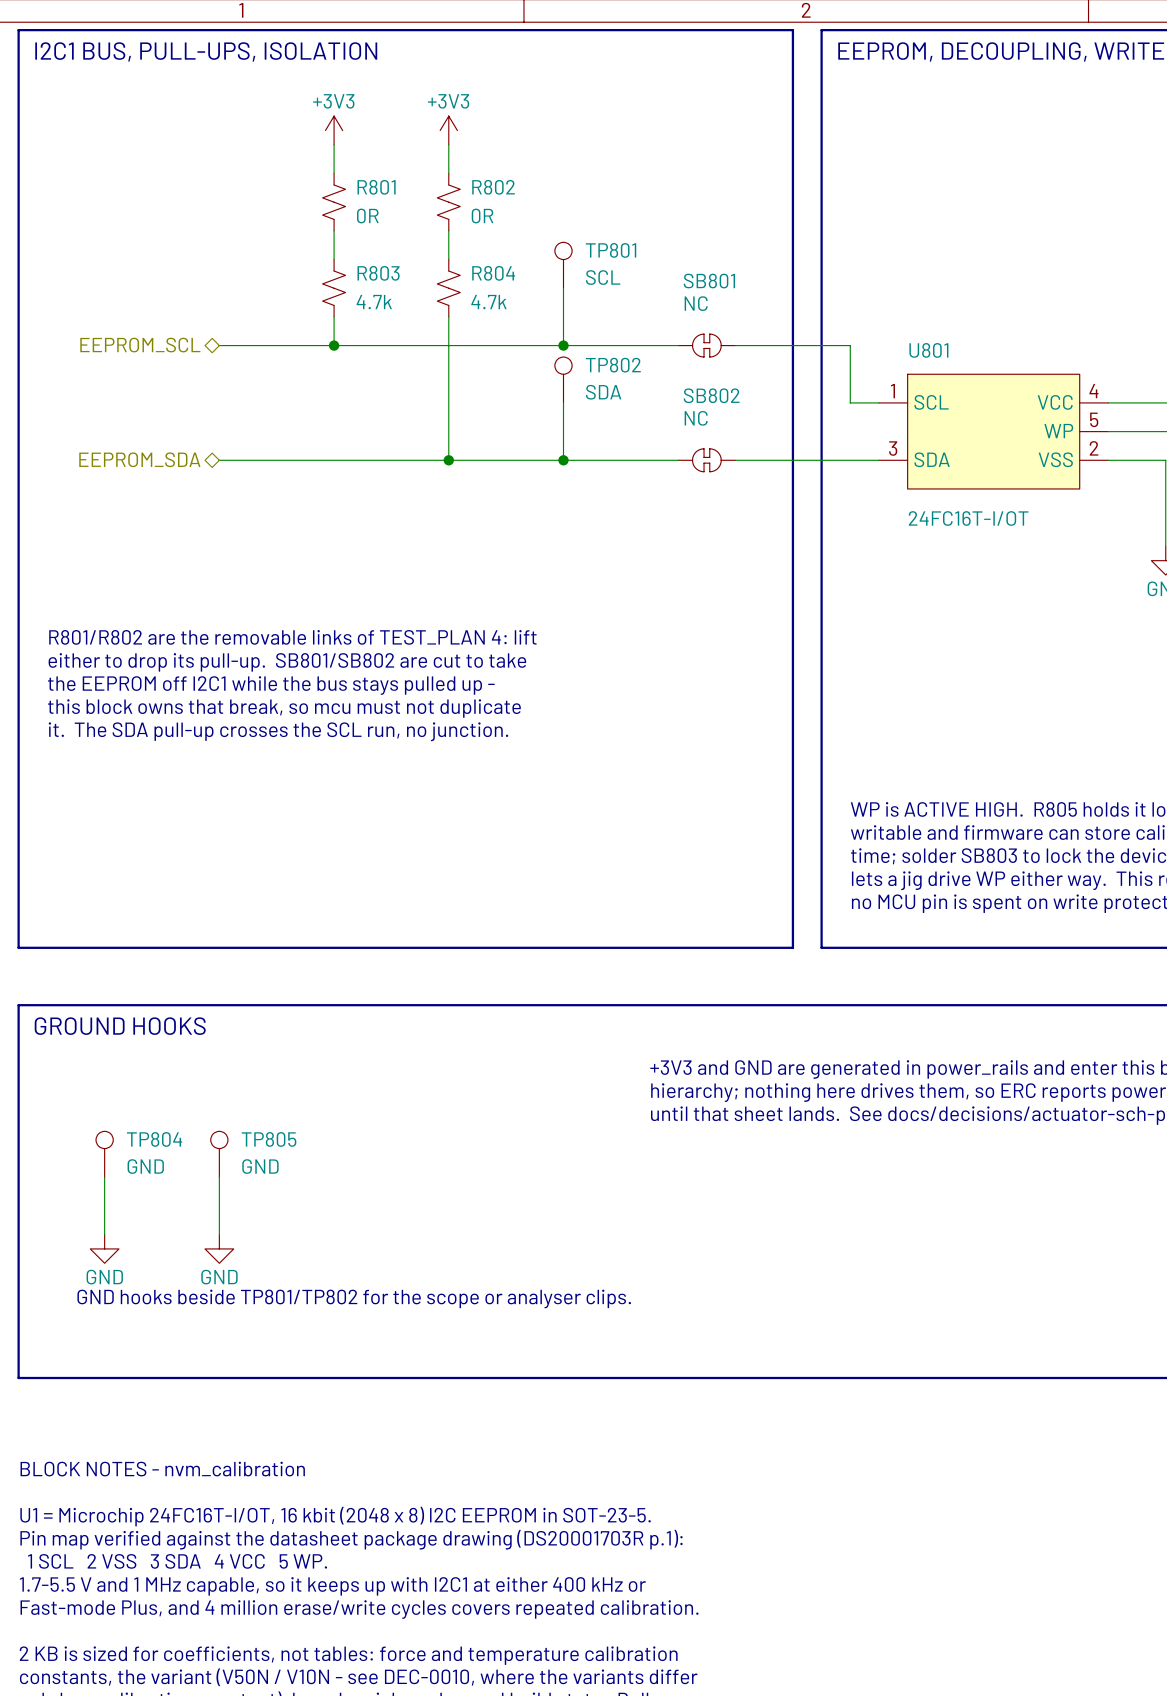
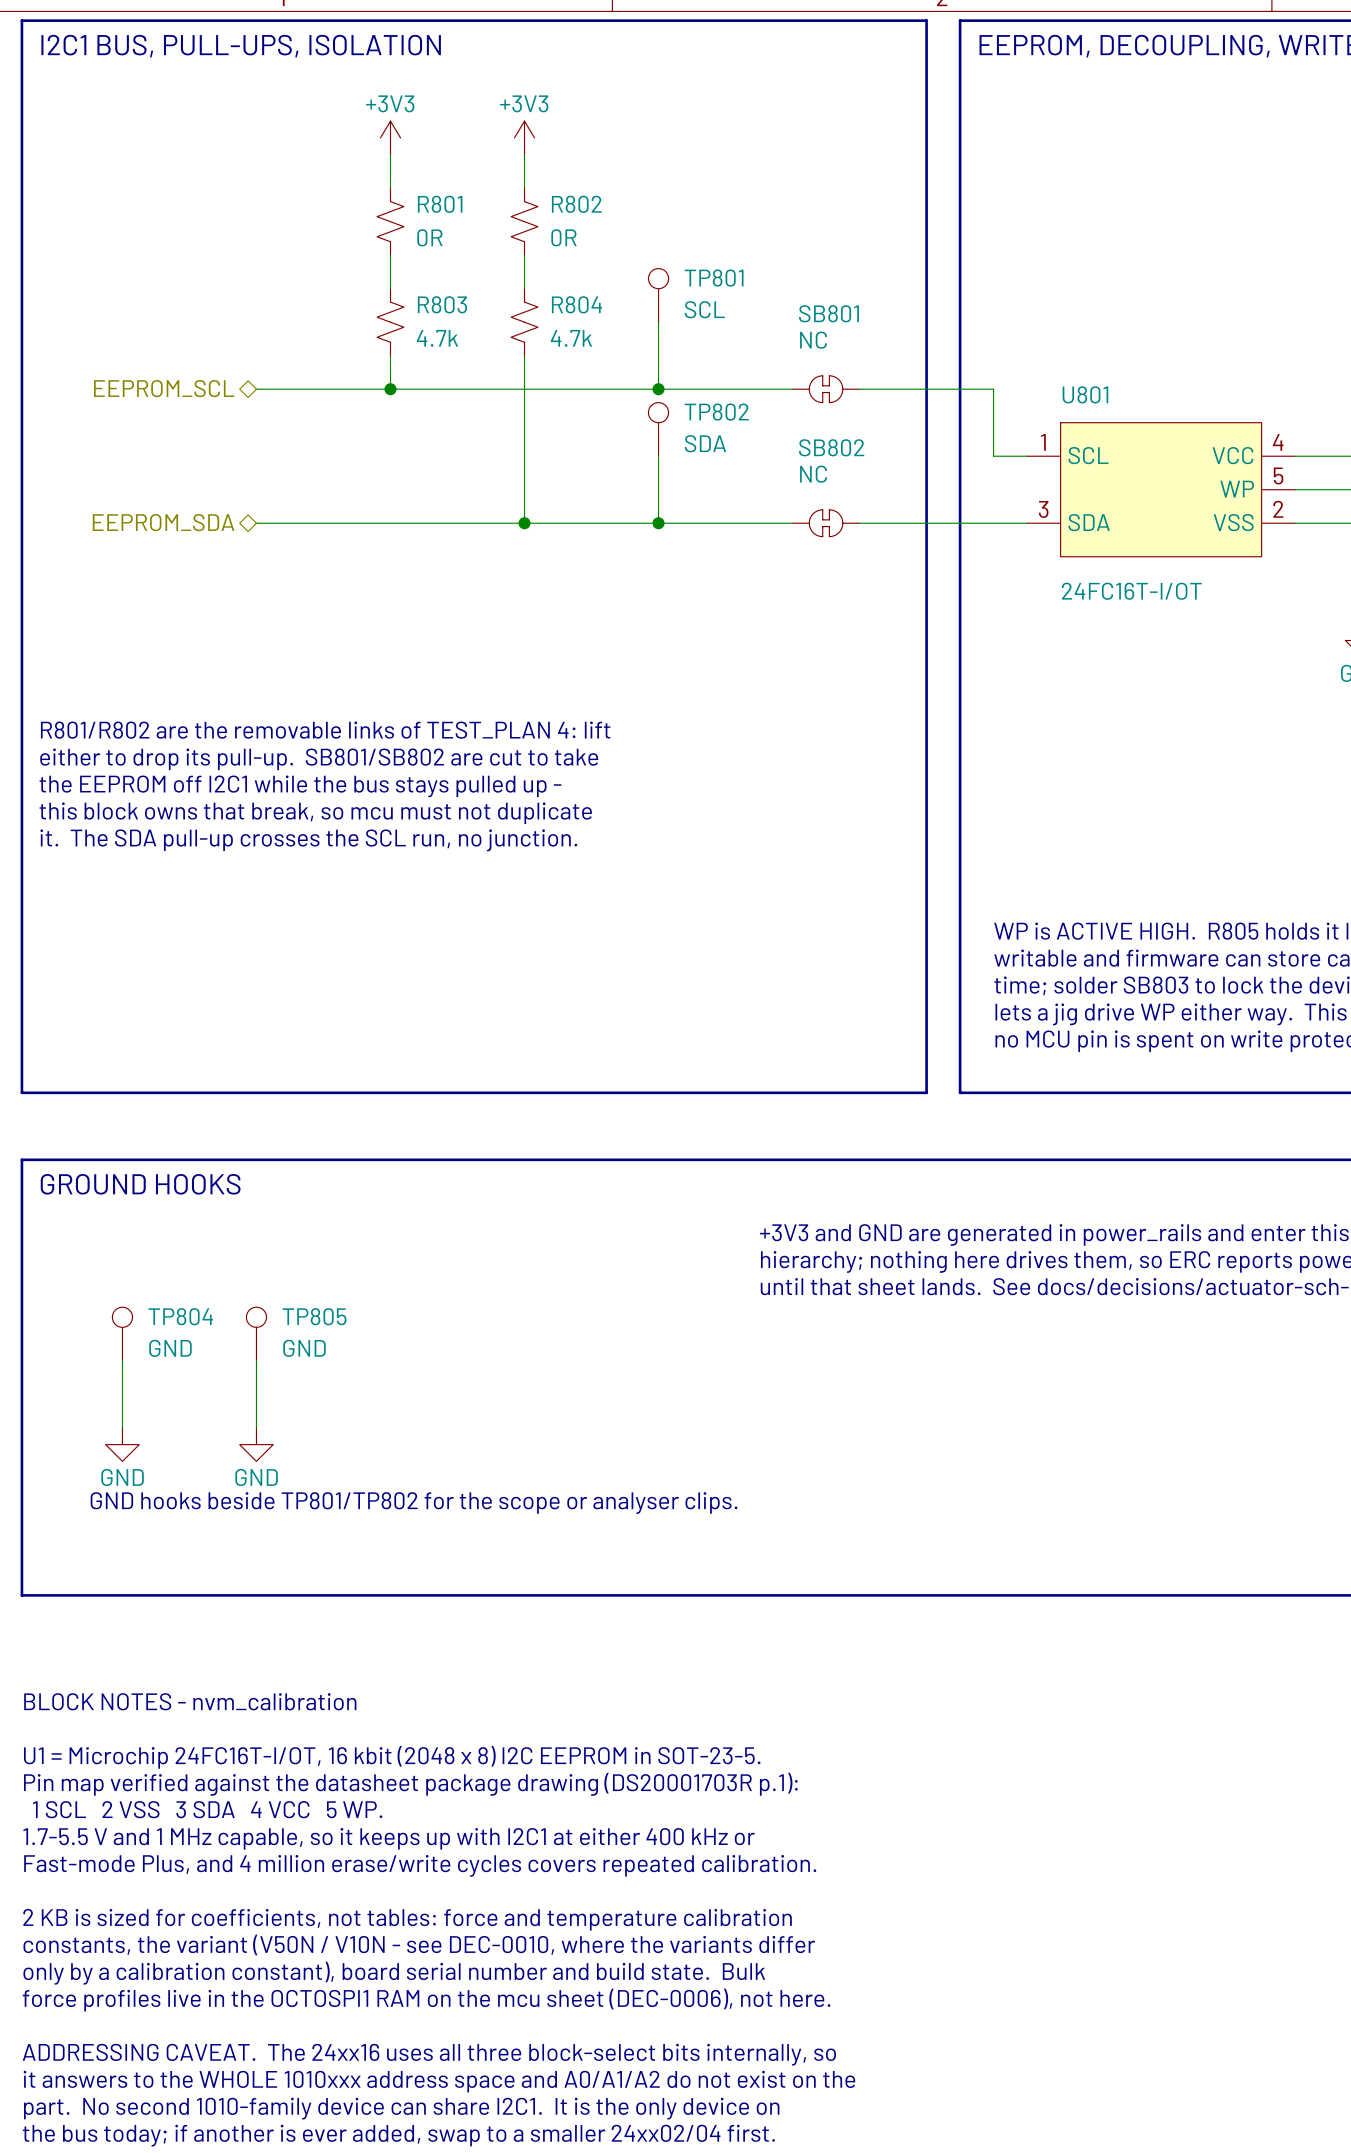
text position: R801/R802 are the removable links of TEST_PLAN 4: lift (292, 637) -> R801/R802 are the removable links of TEST_PLAN 4: lift (325, 730)
text position: either to drop its pull-up. SB801/SB802 are cut to take (287, 662) -> either to drop its pull-up. SB801/SB802 are cut to take (319, 759)
text position: the EEPROM off I2C1 while the bus stays pulled up - (271, 685) -> the EEPROM off I2C1 while the bus stays pulled up - (300, 786)
text position: this block owns that break, so mcu must not duplicate (284, 708) -> this block owns that break, so mcu must not duplicate (315, 813)
text position: it. The SDA pull-up crosses the SCL run, no junction. (278, 731) -> it. The SDA pull-up crosses the SCL run, no junction. (308, 840)

